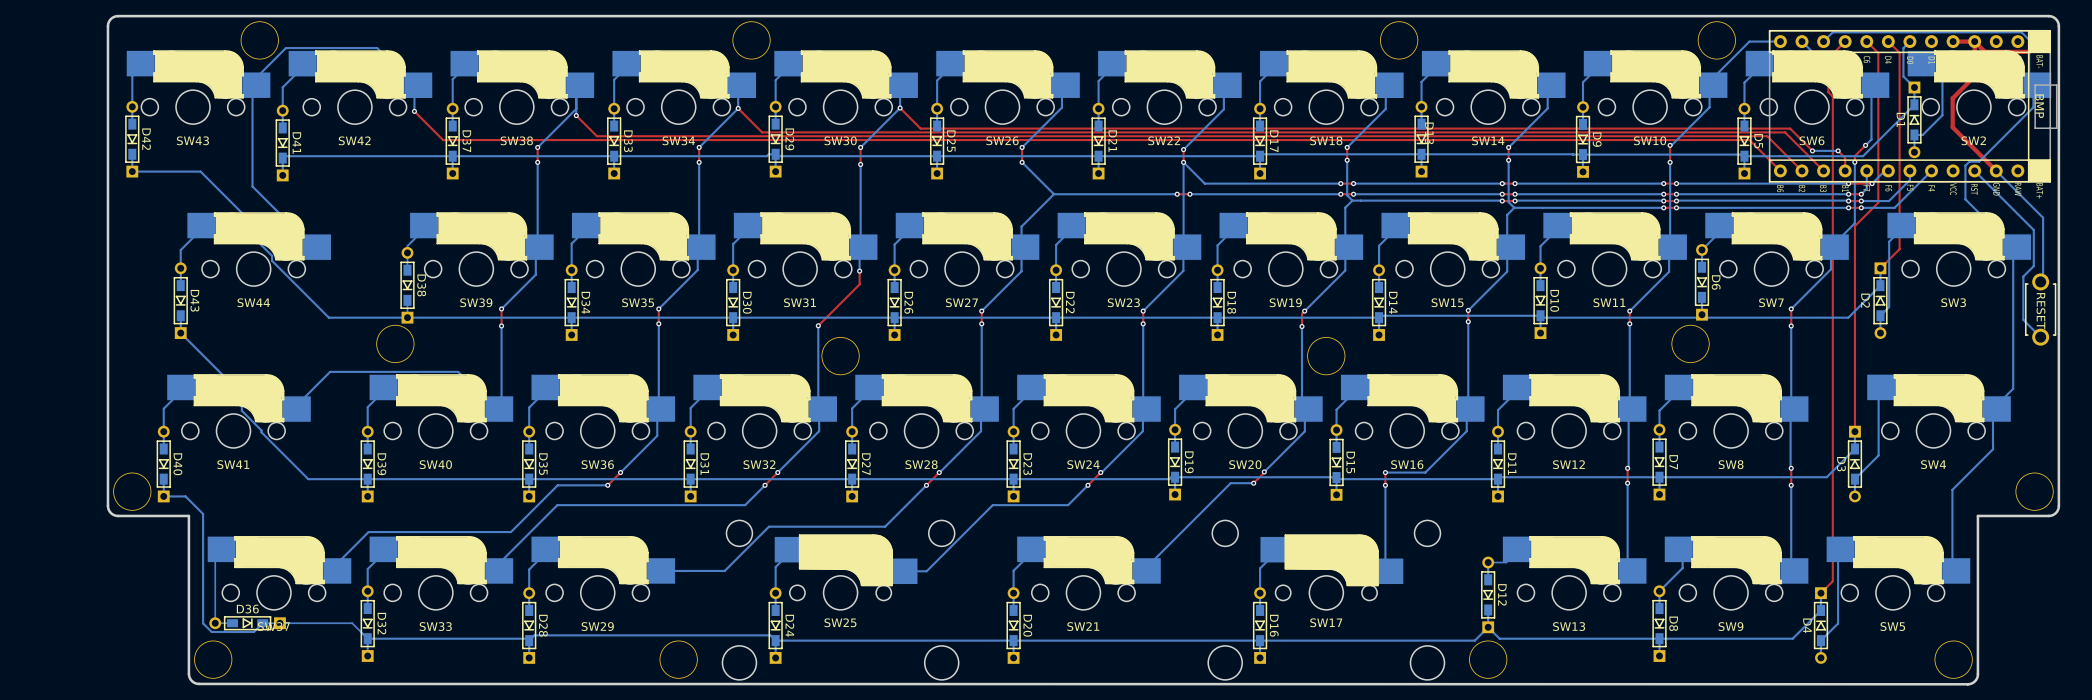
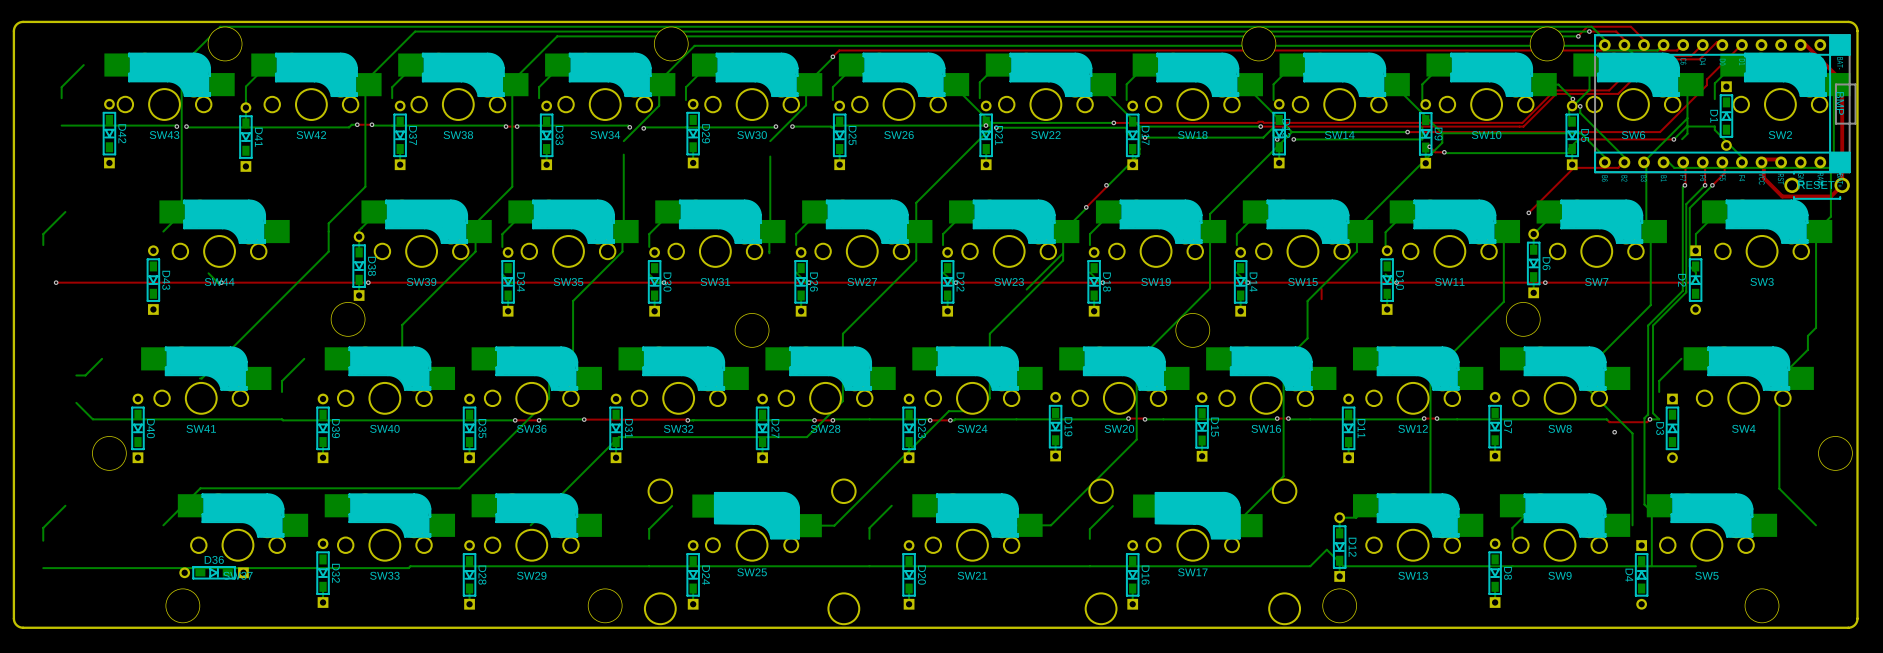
board edge: (118, 16) (110, 19) (107, 26) (108, 506) (110, 513) (116, 515) (188, 515) (188, 673) (191, 679) (196, 683) (1968, 684) (1975, 680) (1977, 674) (1977, 515) (2050, 515) (2056, 512) (2058, 505) -> (96, 21) (22, 21) (16, 24) (13, 30) (13, 618) (15, 624) (21, 627) (1849, 627) (1854, 625) (1857, 618) (1857, 466)
bottom track: none -> (1588, 31) (415, 31) (365, 81) (365, 186) (328, 223) (328, 251) (199, 378)
top track: none -> (1589, 31) (1616, 31) (1626, 42)
via: none -> (1589, 31)
bottom track: none -> (1578, 36) (557, 36) (512, 81) (512, 84)
top track: none -> (1578, 36) (1587, 26) (1630, 26) (1646, 42)
via: none -> (1578, 36)
bottom track: none -> (1607, 42) (1591, 26) (220, 26) (181, 65) (181, 213) (163, 231)
bottom track: none -> (1665, 42) (1657, 50) (1603, 50) (1598, 45) (694, 45) (659, 81) (659, 84)
top track: none -> (1685, 42) (1677, 50) (839, 50) (832, 56)
top track: none -> (1705, 42) (1691, 55) (1643, 55) (1609, 90) (1554, 90) (1522, 122) (1113, 122)
top track: none -> (1724, 42) (1716, 42) (1699, 59) (1652, 59) (1618, 93) (1556, 93) (1523, 126) (1260, 126)
top track: none -> (1744, 42) (1706, 79) (1706, 85) (1660, 132) (1407, 132)
top track: none -> (1803, 42) (1842, 81) (1842, 185) (1830, 196) (1782, 196) (1763, 177) (1763, 159) (1783, 159)
bottom track: (1780, 41) (1749, 41) (1709, 81) (1709, 107) (1670, 145) -> none
bottom track: (1823, 41) (1832, 32) (2021, 32) (2029, 39) (2029, 80) (2033, 85) (2033, 107) (1979, 161) (1969, 161) (1965, 165) (1965, 199) (2013, 247) -> (1830, 167) (1830, 216) (1816, 231)
top track: (1845, 41) (1828, 58) (1828, 92) (1832, 96) (1832, 581) (1820, 593) -> none
top track: (1866, 41) (1878, 53) (1878, 202) (1854, 226) (1854, 431) -> none
top track: (1888, 41) (1899, 52) (1899, 249) (1880, 268) -> none
bottom track: (1909, 41) (1903, 48) (1903, 76) (1914, 87) (1914, 104) (1863, 156) (1572, 154) (284, 156) (282, 158) (282, 175) -> none
top track: (1974, 41) (1953, 41) -> none
top track: (1974, 41) (1974, 76) (1952, 98) (1952, 127) (1996, 170) -> none
top track: (2039, 41) (2029, 51) (1984, 51) (1974, 41) -> none
bottom track: none -> (832, 56) (806, 84)
via: none -> (832, 56)
bottom track: none -> (83, 65) (61, 87) (61, 98)
bottom track: (144, 63) (132, 75) (132, 124) -> none
bottom track: (1115, 63) (1098, 81) (1098, 126) -> (1001, 65) (997, 65) (979, 82) (979, 98)
bottom track: (1277, 63) (1260, 81) (1260, 126) -> (1148, 65) (1145, 65) (1126, 84) (1126, 100)
bottom track: (1439, 63) (1421, 81) (1421, 124) -> (1295, 65) (1292, 65) (1273, 84) (1273, 100)
bottom track: (1601, 63) (1583, 82) (1583, 124) -> (1442, 65) (1422, 84) (1422, 100)
bottom track: (1763, 63) (1744, 82) (1744, 126) -> (1589, 65) (1589, 89) (1569, 110) (1569, 125)
bottom track: (1925, 63) (1942, 80) (1942, 115) (1922, 134) (1914, 134) (1914, 152) -> (1736, 65) (1733, 65) (1714, 83) (1714, 99)
bottom track: (452, 79) (452, 126) -> (400, 79) (392, 87) (392, 98)
bottom track: (614, 79) (614, 126) -> (546, 79) (539, 87) (539, 98)
bottom track: (775, 80) (775, 124) -> (693, 80) (685, 87) (685, 100)
bottom track: (937, 80) (937, 126) -> (839, 80) (832, 87) (832, 100)
bottom track: (1061, 85) (1061, 107) (1022, 147) -> (952, 85) (990, 122)
bottom track: (1547, 85) (1547, 108) (1508, 147) -> none
bottom track: none -> (1393, 84) (1442, 133)
bottom track: none -> (1540, 84) (1558, 84) (1572, 99)
bottom track: none -> (1834, 84) (1833, 164) (1830, 167)
bottom track: (1223, 87) (1223, 109) (1183, 149) -> (1099, 86) (1139, 126)
bottom track: (1385, 87) (1385, 108) (1347, 147) -> (1246, 86) (1291, 132)
via: none -> (1572, 99)
bottom track: (576, 108) (537, 147) -> none
top track: (738, 108) (762, 132) (1785, 132) (1823, 170) -> none
via: (738, 108) -> none
top track: (900, 108) (920, 128) (1790, 128) (1812, 150) -> none
via: (900, 108) -> none
bottom track: none -> (1580, 106) (1580, 112) (1626, 159)
via: none -> (1580, 106)
bottom track: (414, 111) (414, 85) (377, 48) (285, 48) (252, 81) (252, 186) (313, 247) -> none
top track: (414, 111) (443, 140) (1749, 140) (1780, 170) -> none
via: (414, 111) -> none
top track: (576, 115) (596, 136) (1767, 136) (1802, 170) -> none
via: (576, 115) -> none
bottom track: none -> (1113, 122) (990, 122)
via: none -> (1113, 122)
bottom track: none -> (357, 124) (351, 124) (349, 127) (186, 126)
via: none -> (357, 124)
bottom track: none -> (371, 124) (506, 126)
top track: none -> (371, 124) (357, 124)
via: none -> (371, 124)
bottom track: none -> (61, 125) (176, 126)
bottom track: none -> (985, 125) (792, 126)
via: none -> (985, 125)
via: none -> (176, 126)
via: none -> (186, 126)
via: none -> (506, 126)
bottom track: none -> (517, 126) (628, 125) (629, 127)
top track: none -> (517, 126) (506, 126)
via: none -> (517, 126)
bottom track: none -> (775, 126) (643, 128)
via: none -> (775, 126)
via: none -> (792, 126)
bottom track: none -> (1139, 126) (1139, 154) (1106, 185)
bottom track: none -> (1260, 126) (1139, 126)
via: none -> (1260, 126)
via: none -> (629, 127)
bottom track: none -> (996, 127) (1126, 127) (1126, 132) (1132, 137)
via: none -> (996, 127)
bottom track: none -> (1422, 127) (1422, 139) (1293, 139)
via: none -> (643, 128)
bottom track: none -> (1407, 132) (1291, 132)
via: none -> (1407, 132)
bottom track: none -> (1442, 133) (1580, 133) (1607, 159)
bottom track: none -> (1145, 137) (1263, 137) (1273, 127) (1273, 135) (1277, 139)
via: none -> (1145, 137)
via: none -> (1277, 139)
via: none -> (1293, 139)
top track: (1670, 145) (1670, 162) -> none
via: (1670, 145) -> none
bottom track: none -> (1578, 139) (1569, 148) (1569, 153) (1444, 152)
bottom track: none -> (1673, 139) (1686, 126) (1714, 126) (1714, 130) (1744, 159)
top track: none -> (1673, 139) (1578, 139)
via: none -> (1673, 139)
top track: (1865, 145) (1854, 156) (1854, 162) -> none
via: (1865, 145) -> none
top track: (537, 147) (537, 162) -> none
via: (537, 147) -> none
top track: (699, 147) (699, 162) -> none
via: (699, 147) -> none
top track: (860, 147) (860, 164) -> none
via: (860, 147) -> none
top track: (1022, 147) (1022, 162) -> none
via: (1022, 147) -> none
top track: (1347, 147) (1347, 160) -> none
via: (1347, 147) -> none
top track: (1508, 147) (1508, 160) -> none
via: (1508, 147) -> none
top track: (1183, 149) (1183, 162) -> none
via: (1183, 149) -> none
via: (1812, 150) -> none
bottom track: (1838, 150) (1812, 150) -> none
top track: (1838, 150) (1845, 157) (1845, 170) -> none
via: (1838, 150) -> none
top track: none -> (1429, 146) (1435, 152) (1444, 152)
via: none -> (1429, 146)
bottom track: (132, 154) (132, 171) (200, 171) (248, 219) (248, 231) (272, 255) (272, 260) (328, 317) (1379, 317) (1380, 315) (1699, 317) (1701, 314) (1704, 317) (1848, 317) (1880, 285) (1880, 268) -> none
via: none -> (1444, 152)
bottom track: (1347, 160) (1347, 195) (1352, 200) -> none
via: (1347, 160) -> none
bottom track: (1508, 160) (1508, 202) (1514, 207) -> none
via: (1508, 160) -> none
bottom track: (537, 162) (537, 245) (535, 247) -> (512, 112) (512, 186) (475, 223) (475, 231)
via: (537, 162) -> none
via: (699, 162) -> none
bottom track: (1022, 162) (1053, 194) -> none
via: (1022, 162) -> none
via: (1183, 162) -> none
bottom track: (1670, 162) (1669, 247) -> none
via: (1670, 162) -> none
bottom track: (1854, 162) (1854, 223) (1831, 247) -> (1687, 118) (1646, 159) (1646, 227) (1650, 231)
via: (1854, 162) -> none
via: (860, 164) -> none
top track: none -> (1626, 159) (1618, 167) (1573, 167) (1528, 212)
bottom track: none -> (1665, 159) (1674, 167) (1830, 167)
top track: none -> (1685, 159) (1684, 185)
top track: none -> (1705, 159) (1705, 185)
top track: none -> (1724, 159) (1724, 173) (1712, 185)
bottom track: (1866, 170) (1866, 188) (1861, 194) -> none
bottom track: (1888, 170) (1884, 170) (1872, 183) -> none
bottom track: (1909, 170) (1909, 180) (1888, 201) (1861, 201) -> none
bottom track: (1931, 170) (1894, 207) (1861, 207) -> none
bottom track: (1974, 170) (2033, 230) (2033, 266) (2023, 276) (2023, 319) (2040, 337) -> none
bottom track: (1996, 170) (2043, 217) (2043, 279) (2040, 281) -> none
bottom track: (1340, 183) (1204, 183) (1183, 162) (1183, 246) -> (1086, 207) (1063, 231)
via: (1340, 183) -> none
top track: (1353, 183) (1340, 183) -> none
via: (1353, 183) -> none
via: (1502, 183) -> none
bottom track: (1504, 183) (1353, 183) -> none
top track: (1515, 183) (1502, 183) -> none
via: (1515, 183) -> none
bottom track: (1663, 183) (1515, 183) -> none
via: (1663, 183) -> none
top track: (1676, 183) (1663, 183) -> none
via: (1676, 183) -> none
bottom track: (1848, 183) (1676, 183) -> none
via: (1848, 183) -> none
top track: (1872, 183) (1848, 183) -> none
via: (1872, 183) -> none
bottom track: (1053, 194) (1021, 226) -> (990, 122) (990, 128) (916, 202) (916, 212)
bottom track: (1177, 194) (1053, 194) -> none
via: (1177, 194) -> none
top track: (1189, 194) (1177, 194) -> none
via: (1189, 194) -> none
bottom track: (1340, 194) (1189, 194) -> none
via: (1340, 194) -> none
top track: (1353, 194) (1340, 194) -> none
via: (1353, 194) -> none
bottom track: (1502, 194) (1353, 194) -> none
via: (1502, 194) -> none
top track: (1515, 194) (1502, 194) -> none
via: (1515, 194) -> none
bottom track: (1663, 194) (1515, 194) -> none
via: (1663, 194) -> none
top track: (1676, 194) (1663, 194) -> none
via: (1676, 194) -> none
bottom track: (1848, 194) (1676, 194) -> none
via: (1848, 194) -> none
top track: (1861, 194) (1848, 194) -> none
via: (1861, 194) -> none
top track: none -> (1106, 185) (1086, 207)
via: none -> (1106, 185)
bottom track: none -> (1684, 185) (1682, 187) (1682, 290) (1648, 325) (1648, 414) (1644, 418) (1644, 504) (1651, 511) (1651, 566)
via: none -> (1684, 185)
bottom track: none -> (1705, 185) (1686, 204) (1686, 292) (1653, 325) (1653, 413) (1659, 419) (1650, 419)
via: none -> (1705, 185)
bottom track: none -> (1712, 185) (1689, 208) (1689, 266) (1695, 272) (1695, 278) (1692, 282)
via: none -> (1712, 185)
bottom track: (1352, 200) (1345, 207) (1345, 227) -> (1291, 132) (1210, 213)
bottom track: (1352, 200) (1502, 201) -> none
via: (1502, 201) -> none
top track: (1515, 201) (1502, 201) -> none
via: (1515, 201) -> none
bottom track: (1663, 201) (1515, 201) -> none
via: (1663, 201) -> none
top track: (1676, 201) (1663, 201) -> none
via: (1676, 201) -> none
bottom track: (1848, 201) (1676, 201) -> none
via: (1848, 201) -> none
top track: (1861, 201) (1848, 201) -> none
via: (1861, 201) -> none
bottom track: (1514, 207) (1507, 214) (1507, 243) -> (1442, 133) (1442, 142) (1356, 228)
bottom track: (1663, 207) (1514, 207) -> none
via: (1663, 207) -> none
top track: (1676, 207) (1663, 207) -> none
via: (1676, 207) -> none
bottom track: (1848, 207) (1676, 207) -> none
via: (1848, 207) -> none
top track: (1861, 207) (1848, 207) -> none
via: (1861, 207) -> none
via: none -> (1086, 207)
bottom track: none -> (65, 211) (43, 234) (43, 245)
bottom track: (205, 225) (180, 250) (180, 285) -> none
via: none -> (1528, 212)
bottom track: (1889, 241) (1889, 307) (1880, 315) (1880, 333) -> (1703, 226) (1695, 234) (1695, 245)
bottom track: (571, 243) (571, 287) -> (508, 228) (502, 234) (502, 246)
bottom track: (733, 244) (733, 287) -> (654, 228) (649, 234) (649, 246)
bottom track: (894, 244) (894, 287) -> (801, 229) (796, 234) (796, 245)
bottom track: (1056, 244) (1056, 287) -> (947, 229) (943, 234) (943, 245)
bottom track: (1217, 245) (1217, 287) -> (1094, 229) (1089, 234) (1089, 245)
bottom track: (1379, 245) (1379, 287) -> (1240, 230) (1236, 234) (1236, 245)
bottom track: (1540, 246) (1540, 285) -> (1387, 230) (1385, 246)
bottom track: (535, 269) (535, 274) (501, 308) -> (475, 251) (402, 324) (402, 378)
bottom track: (697, 269) (658, 308) -> (622, 251) (573, 301) (573, 354) (549, 378) (549, 398) (459, 488) (200, 488) (163, 525)
bottom track: (1507, 269) (1507, 271) (1468, 310) -> (1356, 251) (1307, 301) (1307, 338) (1283, 362) (1283, 476) (1234, 525) (1209, 525)
bottom track: (1831, 269) (1791, 308) -> (1650, 251) (1650, 305) (1577, 378) (1632, 433) (1632, 525)
bottom track: (1345, 270) (1304, 311) -> (1210, 252) (1210, 288) (1136, 361) (1136, 439) (1050, 525) (989, 525)
top track: (859, 271) (859, 284) (818, 325) -> none
via: (859, 271) -> none
bottom track: (1021, 271) (981, 311) -> (916, 253) (916, 260) (842, 333) (842, 401) (806, 437) (618, 437) (530, 525)
bottom track: (1669, 271) (1629, 311) -> (1503, 253) (1503, 301) (1430, 375) (1430, 506) (1448, 525)
bottom track: none -> (796, 272) (806, 282) (809, 282)
bottom track: none -> (943, 272) (953, 282) (955, 282)
bottom track: none -> (1089, 272) (1100, 282) (1102, 282)
bottom track: none -> (1236, 272) (1247, 282)
bottom track: none -> (208, 273) (217, 282) (221, 282)
bottom track: none -> (502, 274) (510, 282) (513, 282)
bottom track: none -> (649, 274) (657, 282) (663, 282)
bottom track: none -> (1385, 274) (1393, 282) (1396, 282)
via: none -> (56, 282)
via: none -> (221, 282)
via: none -> (368, 282)
via: none -> (663, 282)
via: none -> (809, 282)
via: none -> (955, 282)
via: none -> (1102, 282)
via: none -> (1247, 282)
via: none -> (1396, 282)
via: none -> (1545, 282)
top track: none -> (1692, 282) (56, 282)
top track: (501, 308) (501, 325) -> none
via: (501, 308) -> none
top track: (658, 308) (658, 323) -> none
via: (658, 308) -> none
top track: (1791, 308) (1791, 325) -> none
via: (1791, 308) -> none
part rotation: 0° (2040, 309) -> 90° clockwise (1817, 185)
part position: (2040, 309) -> (1817, 185)
via: (1468, 310) -> none
top track: (981, 311) (981, 323) -> none
via: (981, 311) -> none
top track: (1143, 311) (1143, 323) -> none
via: (1143, 311) -> none
top track: (1304, 311) (1301, 313) (1301, 326) -> none
via: (1304, 311) -> none
top track: (1629, 311) (1629, 323) -> none
via: (1629, 311) -> none
bottom track: (180, 315) (180, 333) (241, 394) (241, 410) (308, 479) (1826, 477) (1854, 448) (1854, 431) -> none
bottom track: (1468, 321) (1466, 431) (1425, 472) (1385, 472) -> none
via: (1468, 321) -> none
bottom track: (658, 323) (657, 435) (620, 472) -> none
via: (658, 323) -> none
bottom track: (981, 323) (981, 431) (939, 472) -> none
via: (981, 323) -> none
bottom track: (1143, 323) (1142, 431) (1100, 472) -> none
via: (1143, 323) -> none
bottom track: (1629, 323) (1627, 468) -> none
via: (1629, 323) -> none
bottom track: (501, 325) (501, 402) (495, 409) (458, 371) (330, 371) (292, 409) -> none
via: (501, 325) -> none
bottom track: (818, 325) (819, 431) (777, 472) -> none
via: (818, 325) -> none
bottom track: (1791, 325) (1791, 468) -> none
via: (1791, 325) -> none
bottom track: (1301, 326) (1301, 406) (1304, 409) (1304, 431) (1264, 471) -> none
via: (1301, 326) -> none
bottom track: (2013, 353) (2013, 388) (1992, 408) (1992, 444) -> (1816, 327) (1807, 335) (1807, 349) (1779, 378) (1779, 488) (1815, 525)
bottom track: none -> (102, 358) (85, 375) (76, 375)
bottom track: (185, 387) (163, 408) (163, 448) -> none
bottom track: none -> (304, 358) (282, 381) (282, 391)
bottom track: (387, 387) (367, 407) (367, 448) -> none
bottom track: (549, 387) (529, 407) (529, 448) -> none
bottom track: (711, 387) (690, 408) (690, 448) -> none
bottom track: (873, 387) (852, 408) (852, 448) -> none
bottom track: (1035, 387) (1013, 408) (1013, 448) -> none
bottom track: (1196, 387) (1175, 409) (1175, 447) -> none
bottom track: (1358, 387) (1336, 409) (1336, 447) -> none
bottom track: (1520, 387) (1498, 410) (1498, 448) -> none
bottom track: (1682, 387) (1659, 410) (1659, 447) -> none
bottom track: none -> (1681, 358) (1659, 381) (1659, 391)
bottom track: (1885, 387) (1878, 393) (1878, 455) (1854, 479) (1854, 496) -> none
bottom track: none -> (76, 402) (92, 419) (515, 420)
bottom track: (1993, 444) (1993, 449) (1952, 489) (1952, 570) -> none
bottom track: none -> (1128, 418) (950, 420)
top track: none -> (1128, 418) (1145, 419)
via: none -> (1128, 418)
bottom track: none -> (1277, 418) (1145, 419)
via: none -> (1277, 418)
top track: none -> (1288, 418) (1277, 418)
via: none -> (1288, 418)
bottom track: none -> (1424, 418) (1288, 418)
via: none -> (1424, 418)
bottom track: none -> (1436, 418) (1607, 420)
top track: none -> (1436, 418) (1424, 418)
via: none -> (1436, 418)
bottom track: none -> (584, 419) (539, 420)
top track: none -> (584, 419) (687, 420)
via: none -> (584, 419)
via: none -> (1145, 419)
top track: none -> (1650, 419) (1647, 422) (1609, 422) (1607, 420)
via: none -> (515, 420)
top track: none -> (539, 420) (515, 420)
via: none -> (539, 420)
via: none -> (687, 420)
bottom track: none -> (814, 420) (687, 420)
via: none -> (814, 420)
top track: none -> (832, 420) (814, 420)
via: none -> (832, 420)
bottom track: none -> (930, 420) (832, 420)
via: none -> (930, 420)
top track: none -> (950, 420) (930, 420)
via: none -> (950, 420)
top track: (1627, 468) (1627, 483) -> none
via: (1627, 468) -> none
top track: (1791, 468) (1791, 482) -> none
top track: (1264, 471) (1253, 483) -> none
via: (1264, 471) -> none
top track: (620, 472) (607, 485) -> none
via: (620, 472) -> none
top track: (777, 472) (765, 485) -> none
via: (777, 472) -> none
top track: (939, 472) (926, 485) -> none
via: (939, 472) -> none
top track: (1100, 472) (1087, 485) -> none
via: (1100, 472) -> none
top track: (1385, 472) (1385, 485) -> none
via: (1385, 472) -> none
bottom track: (163, 479) (163, 496) (185, 496) (203, 513) (203, 623) (211, 631) (254, 631) (262, 623) (352, 623) (367, 638) -> none
bottom track: (1253, 483) (1230, 483) (1142, 570) -> none
via: (1253, 483) -> none
bottom track: (1627, 483) (1628, 570) -> none
via: (1627, 483) -> none
bottom track: (607, 485) (557, 485) (510, 532) (368, 532) (333, 567) (333, 570) -> none
via: (607, 485) -> none
bottom track: (765, 485) (745, 505) (557, 505) (495, 567) (495, 570) -> none
via: (765, 485) -> none
bottom track: (926, 485) (885, 526) (768, 526) (724, 570) (657, 570) -> none
via: (926, 485) -> none
bottom track: (1087, 485) (1068, 505) (992, 505) (926, 571) -> (1063, 253) (1063, 260) (989, 333) (989, 398) (977, 411) (948, 411) (834, 525) (830, 525)
via: (1087, 485) -> none
bottom track: (1385, 485) (1384, 571) -> none
via: (1385, 485) -> none
bottom track: (1791, 485) (1790, 570) -> none
via position: (1791, 485) -> (1650, 419)
bottom track: none -> (65, 505) (43, 527) (43, 540)
bottom track: (225, 549) (215, 559) (215, 623) (232, 623) -> none
bottom track: (387, 549) (367, 569) (367, 608) -> none
bottom track: (549, 549) (529, 569) (529, 610) -> none
bottom track: none -> (672, 506) (649, 529) (649, 538)
bottom track: (792, 549) (775, 567) (775, 610) -> none
bottom track: none -> (891, 505) (869, 528) (869, 538)
bottom track: (1035, 549) (1013, 570) (1013, 610) -> none
bottom track: none -> (1112, 506) (1089, 529) (1089, 538)
bottom track: (1278, 549) (1260, 568) (1260, 610) -> none
bottom track: (1682, 549) (1682, 568) (1659, 591) (1659, 608) -> none
bottom track: none -> (1534, 505) (1512, 527) (1512, 538)
bottom track: (1844, 549) (1838, 555) (1838, 623) (1820, 640) (1820, 657) -> none
bottom track: (1820, 593) (1820, 610) (1792, 638) (1499, 638) (1488, 627) (1474, 640) (775, 640) (770, 635) (534, 635) (529, 640) (527, 638) (367, 638) -> none
bottom track: none -> (1695, 566) (1343, 566) (1326, 549) (1310, 566) (43, 568)

